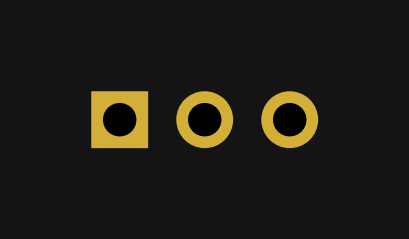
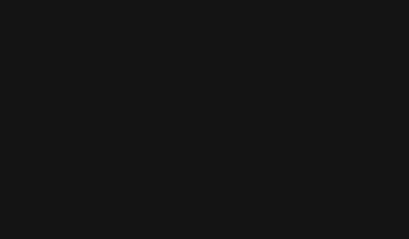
part: (204, 119) -> none

